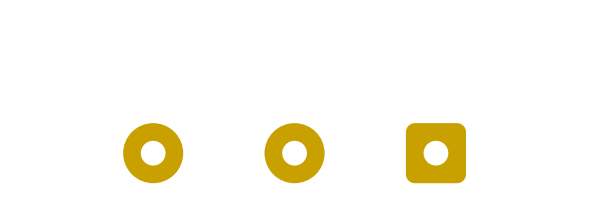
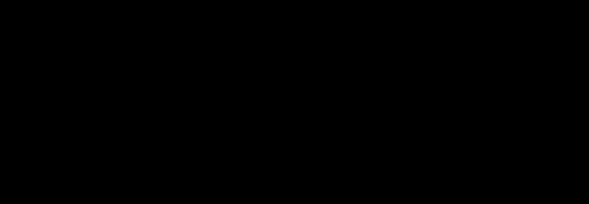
part: (294, 153) -> none

